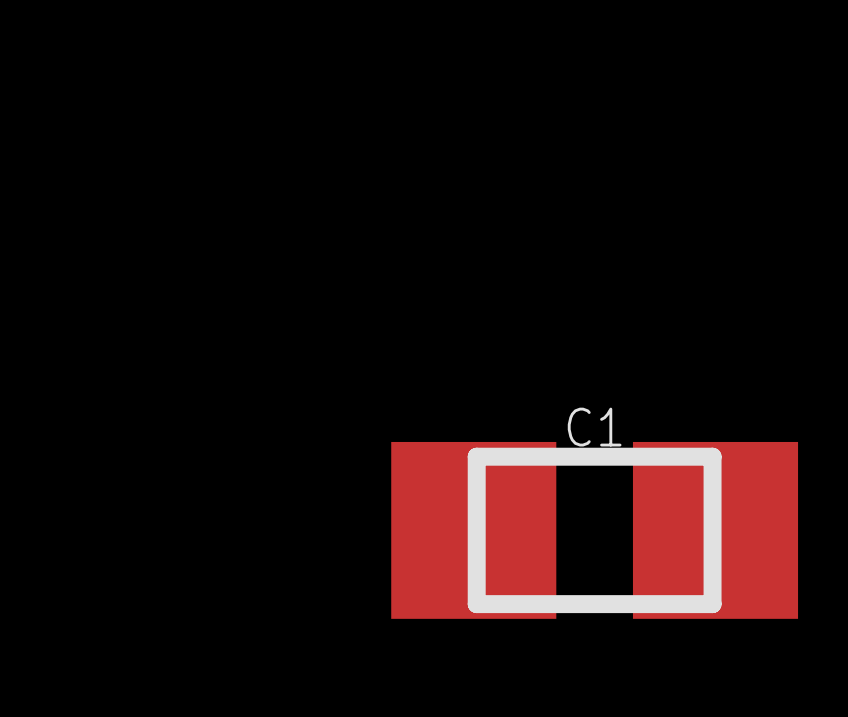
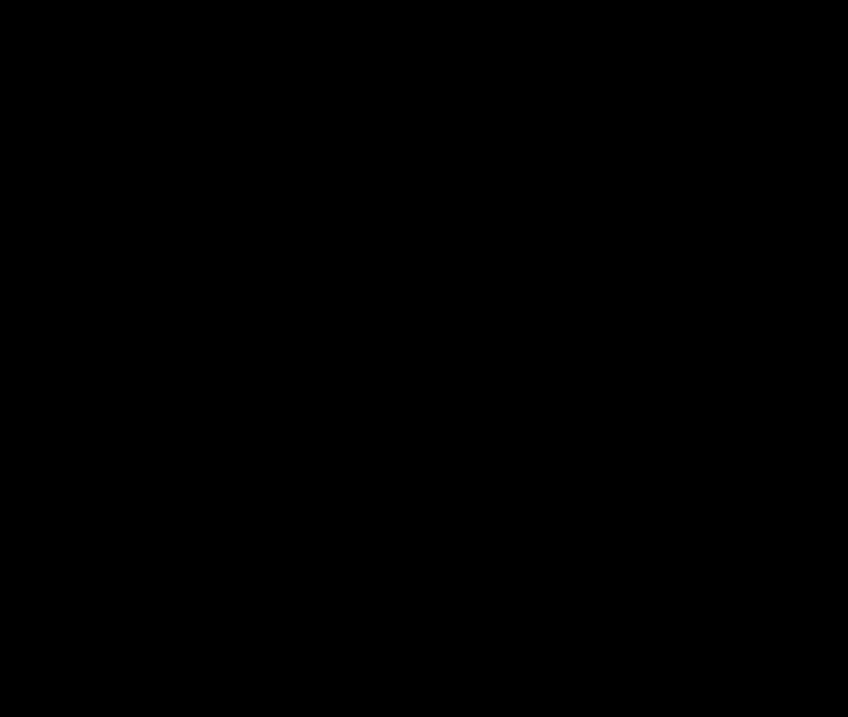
C1: (594, 530) -> none

